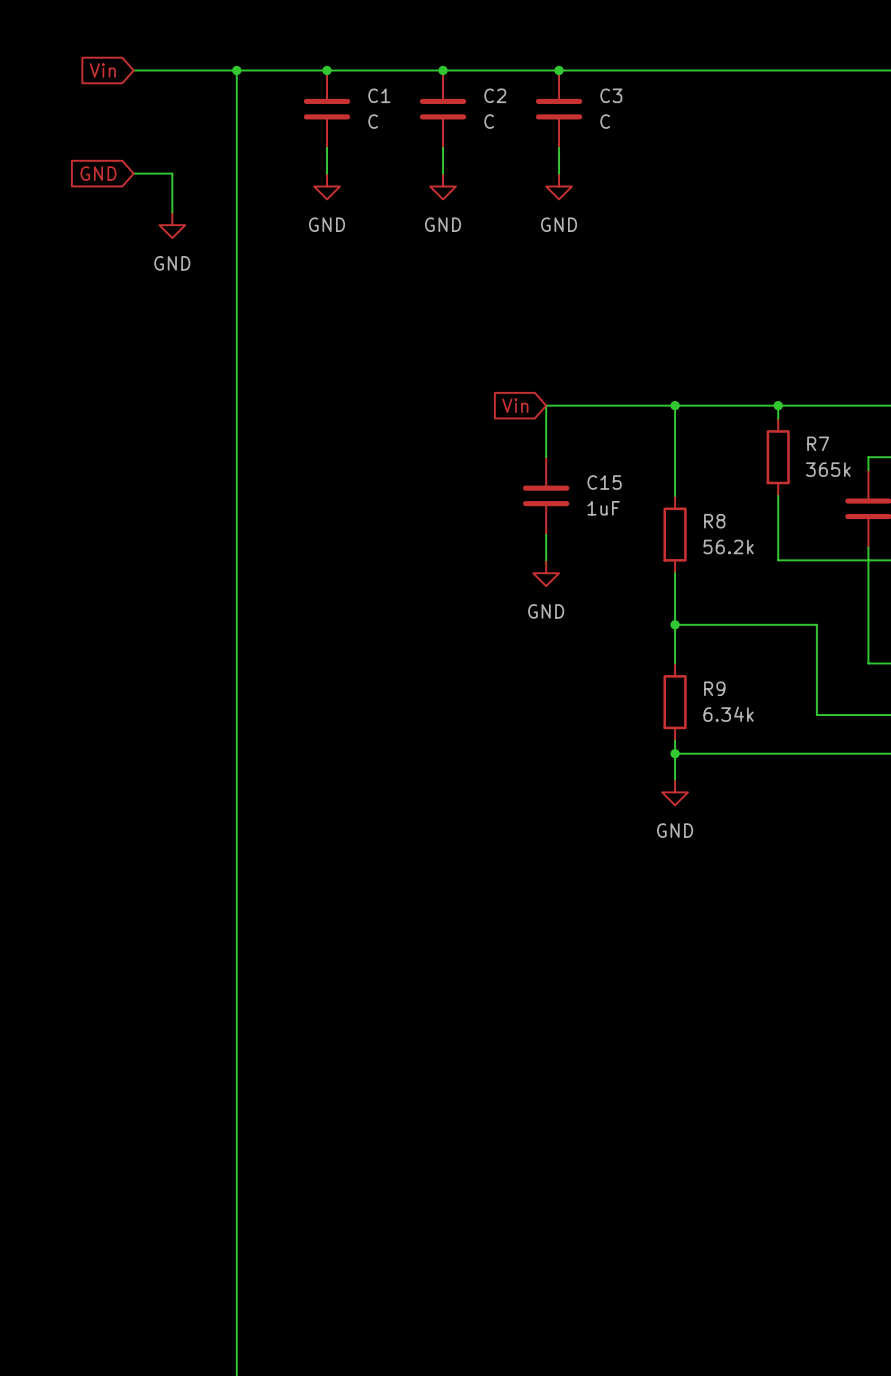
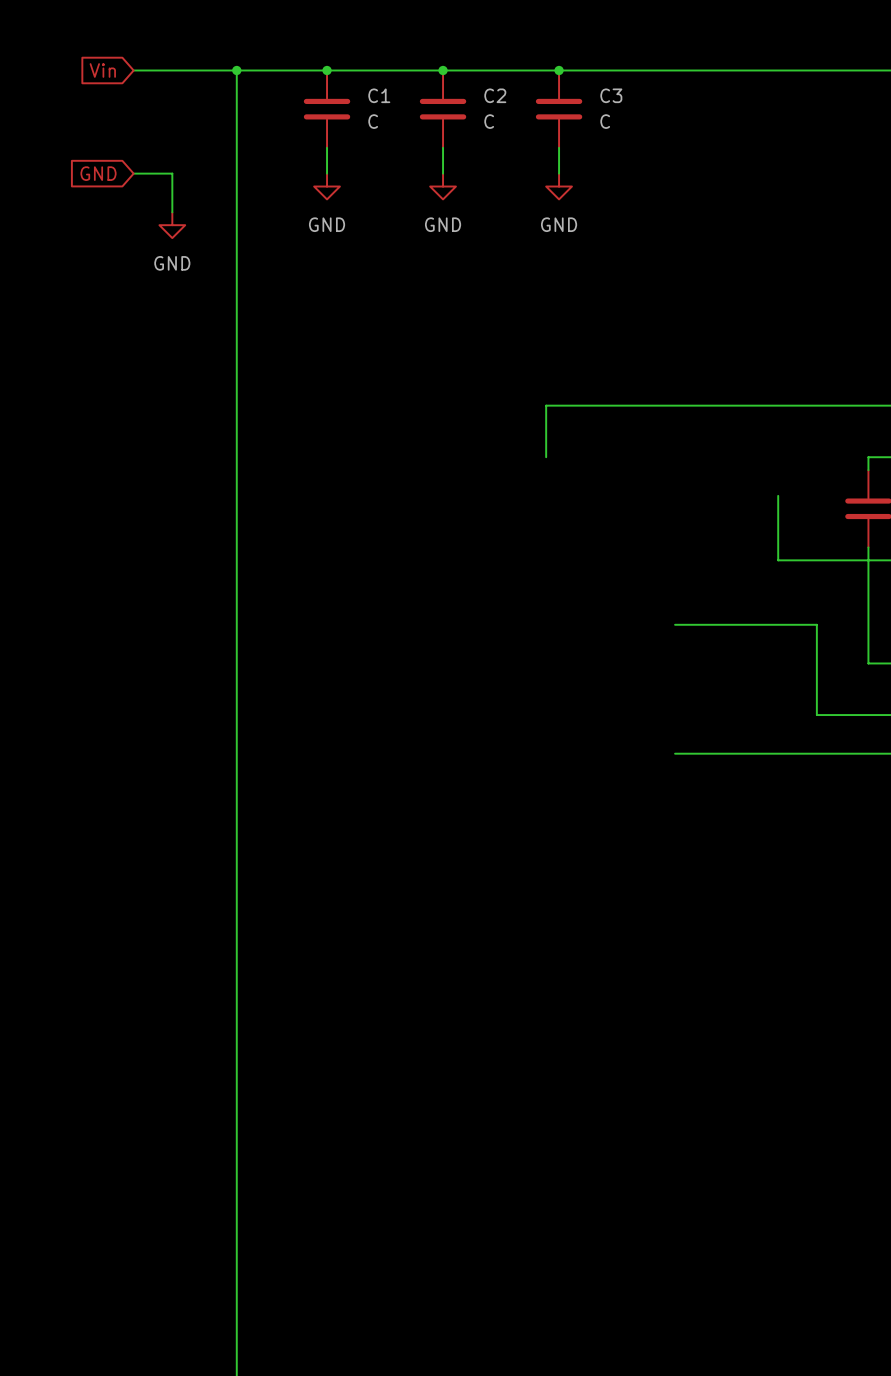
global label: Vin (515, 405) -> none
wire: (675, 405) (675, 495) -> none
junction: (675, 405) -> none
wire: (778, 405) (778, 418) -> none
junction: (778, 405) -> none
R7: 365k (778, 457) -> none
C15: 1uF (546, 495) -> none
wire: (546, 534) (546, 560) -> none
R8: 56.2k (675, 534) -> none
power symbol: GND (546, 573) -> none
wire: (675, 573) (675, 663) -> none
junction: (675, 624) -> none
R9: 6.34k (675, 702) -> none
wire: (675, 740) (675, 779) -> none
junction: (675, 753) -> none
power symbol: GND (675, 792) -> none

